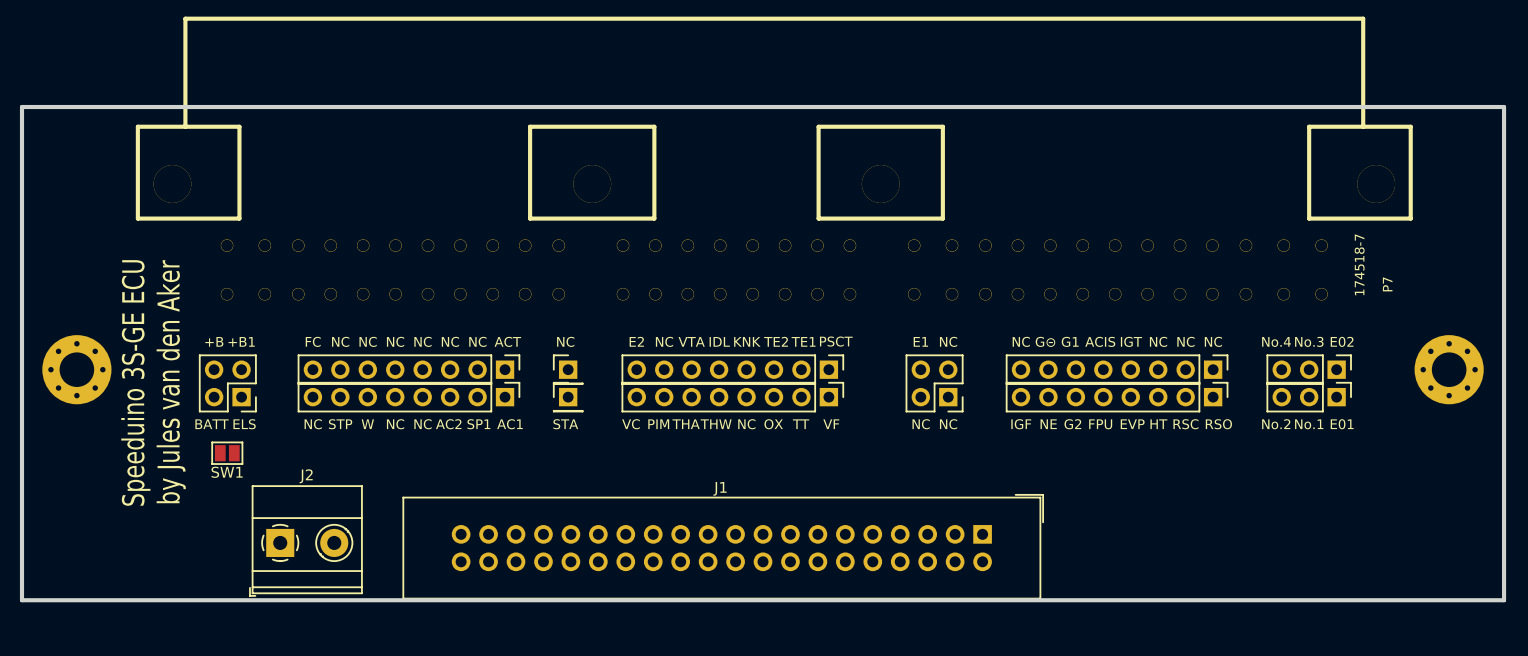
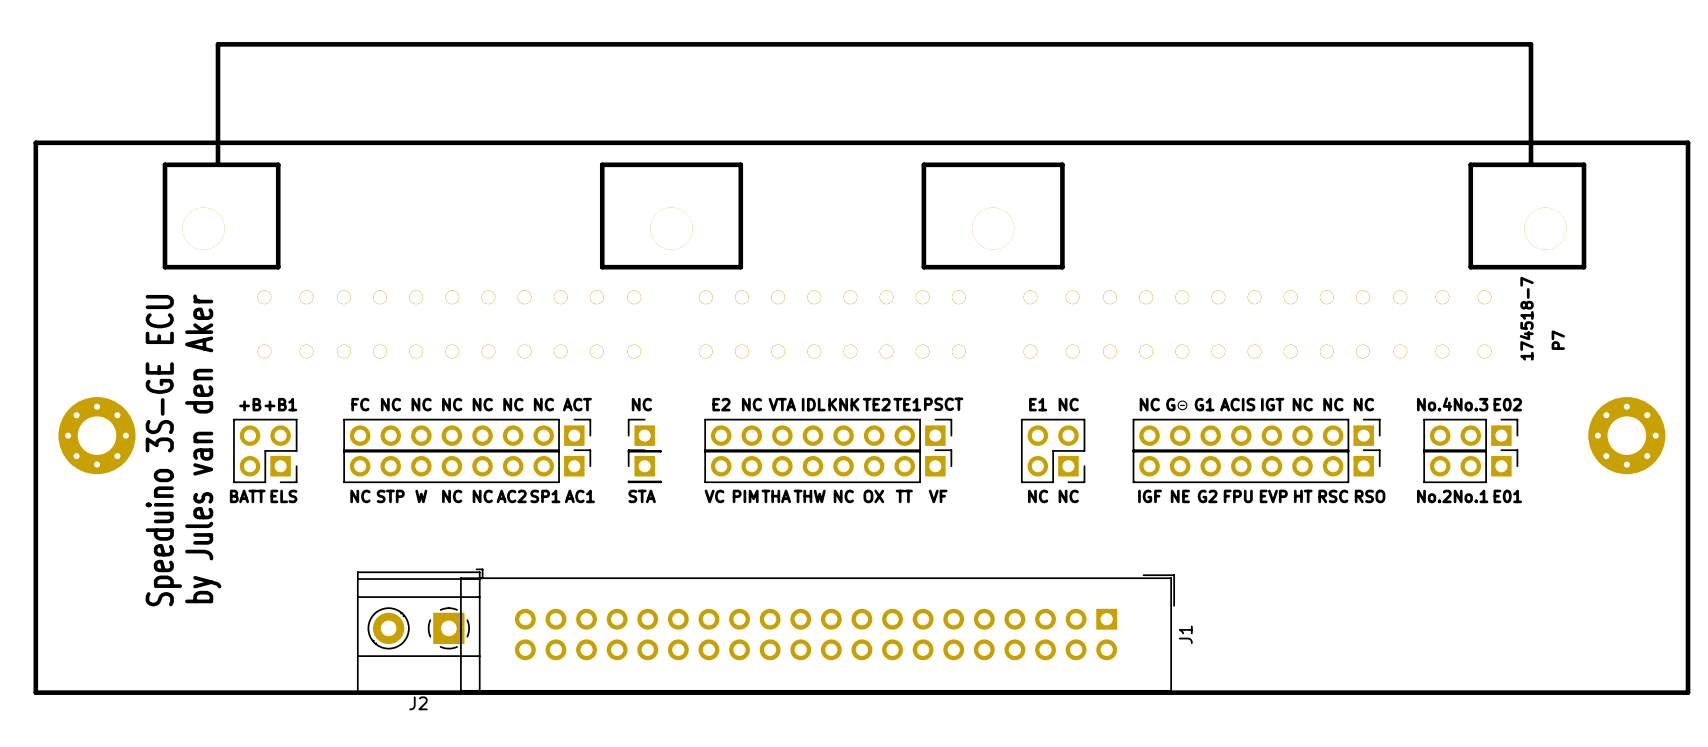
SW1: (227, 453) -> none
J1 name rotation: 0° (720, 488) -> 90° counterclockwise (1185, 634)
J1 name position: J1 (720, 488) -> J1 (1185, 634)
J2 rotation: 0° (305, 541) -> 180° (420, 630)

